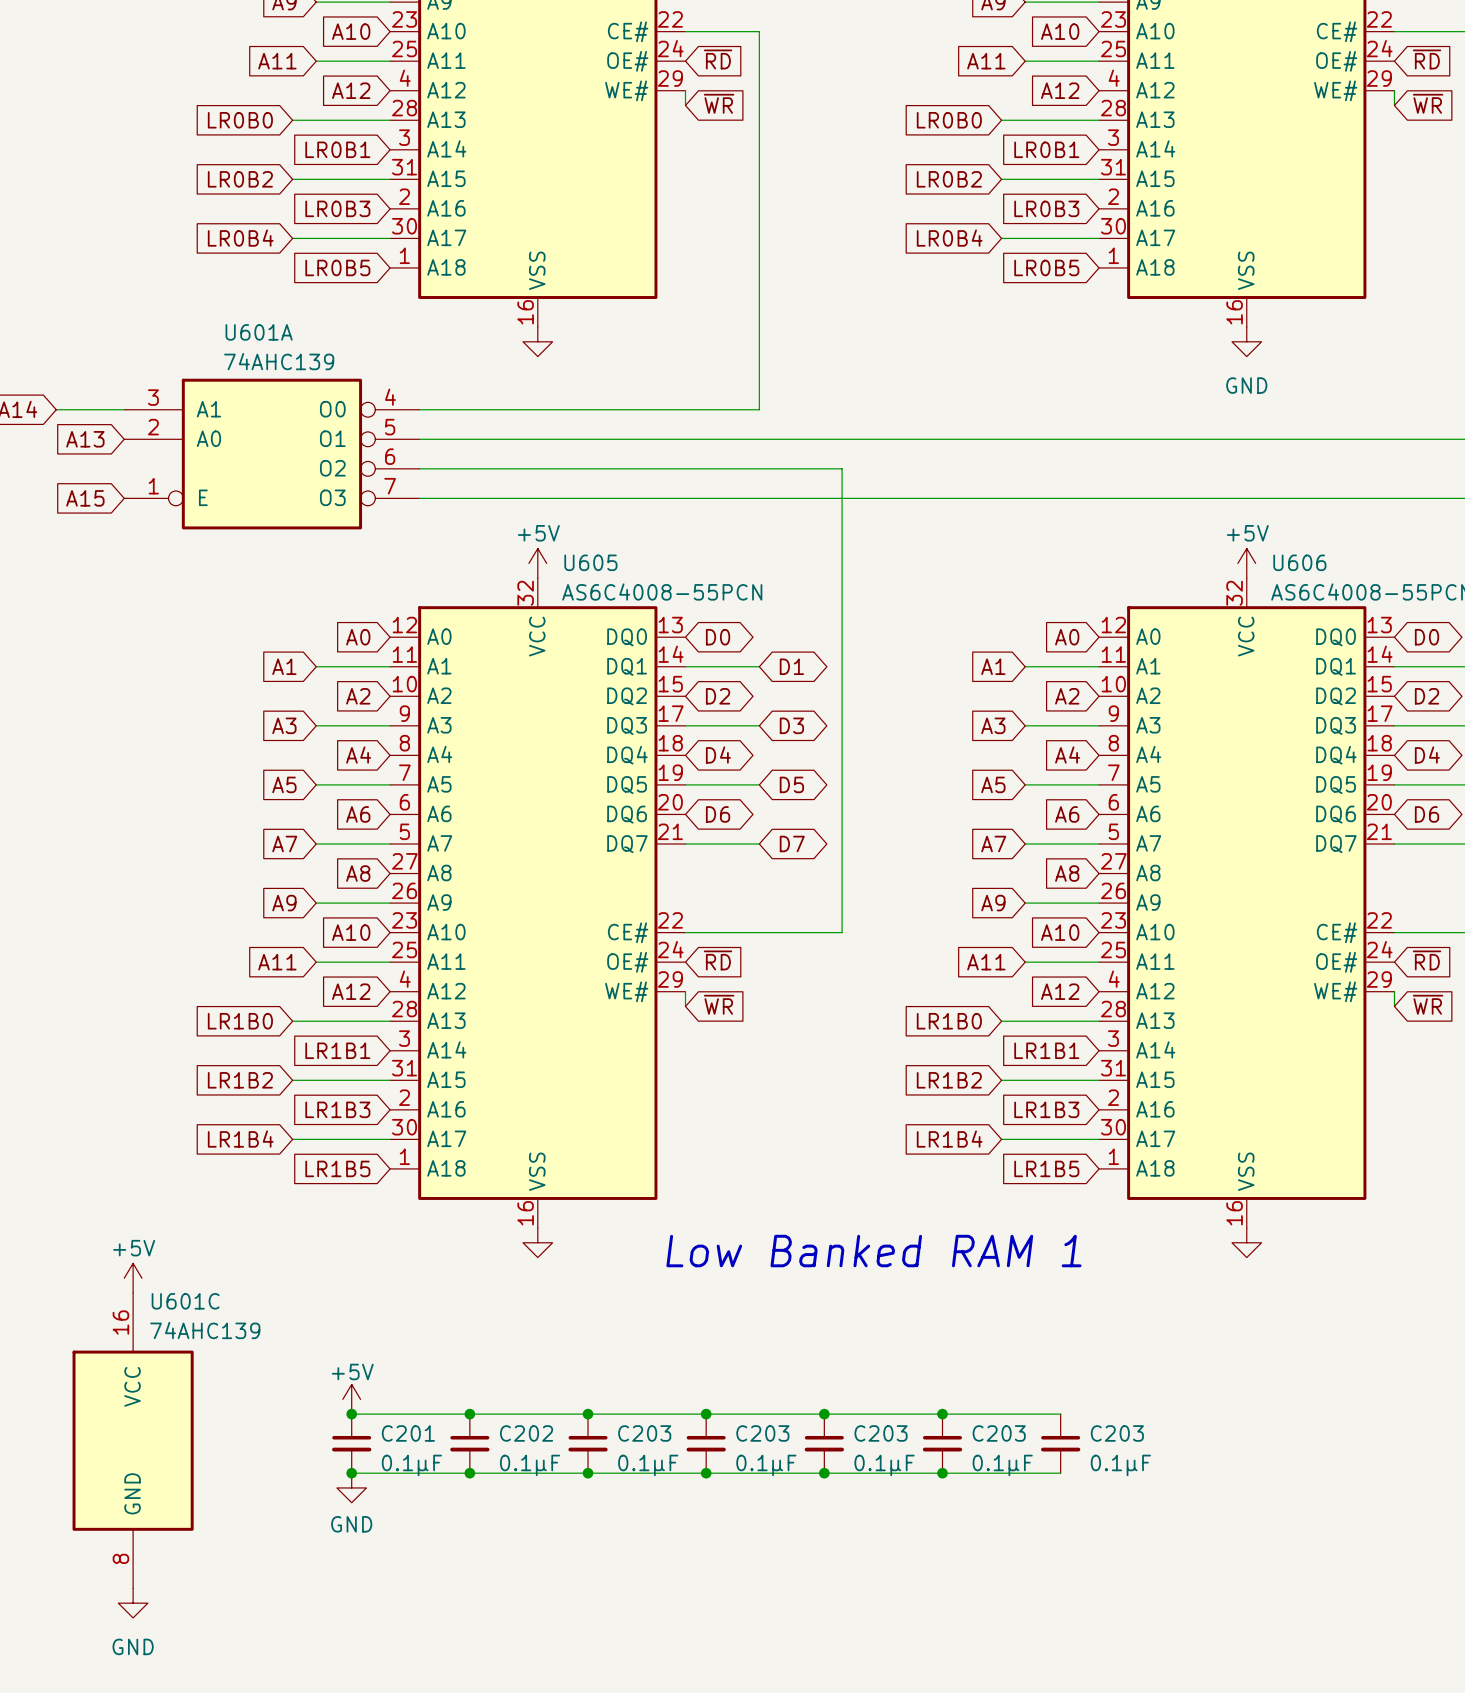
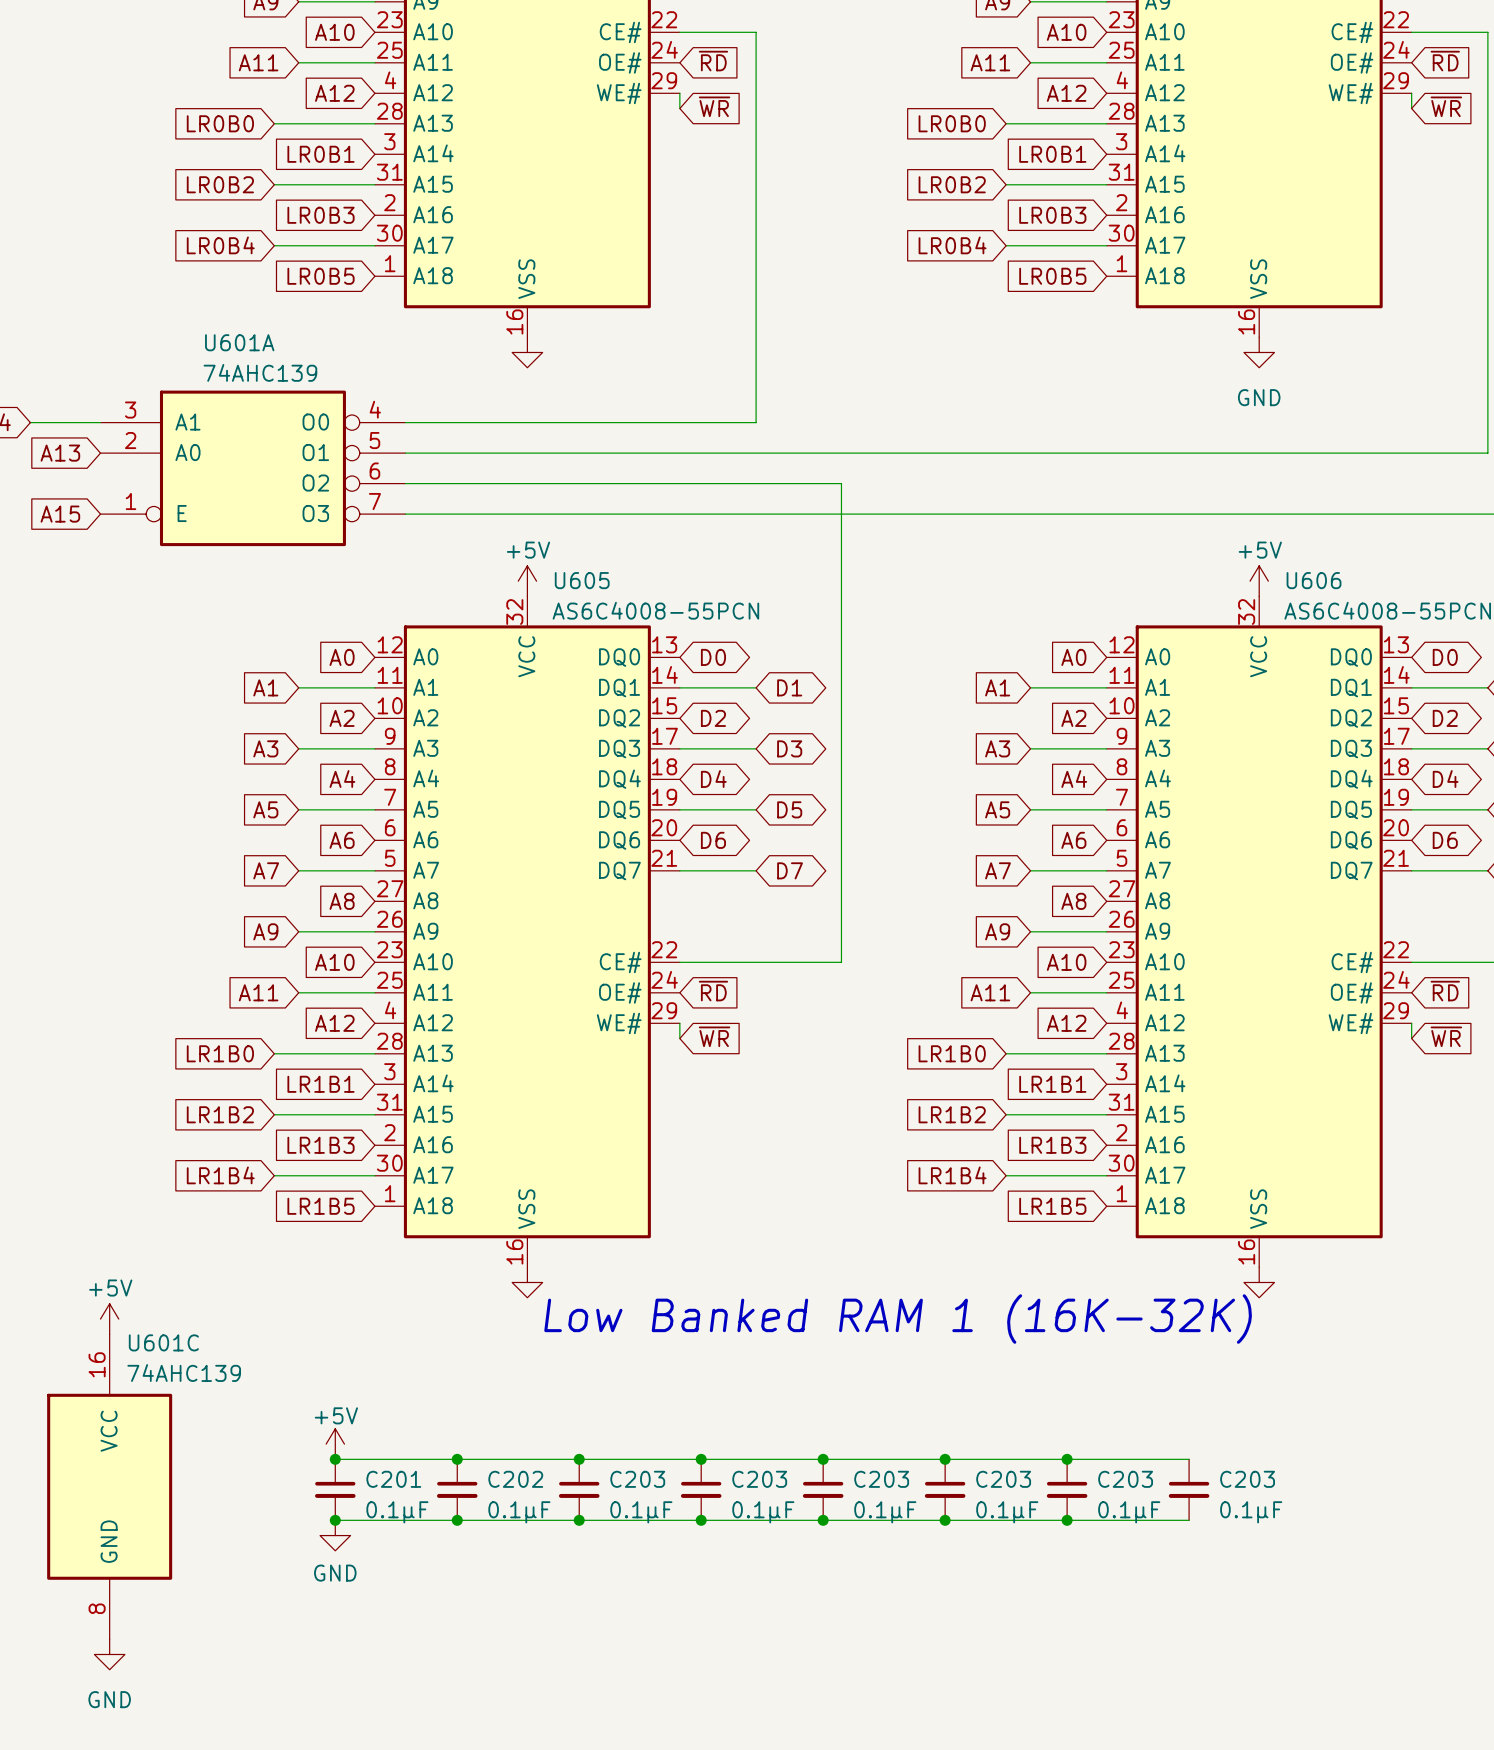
text: Low Banked RAM 1 (873, 1251) -> Low Banked RAM 1 (16K-32K) (898, 1319)
wire: none -> (1067, 1459) (1189, 1459)
junction: none -> (1067, 1459)
C203: none -> 0.1µF (1189, 1489)
wire: none -> (1067, 1520) (1189, 1520)
junction: none -> (1067, 1520)

